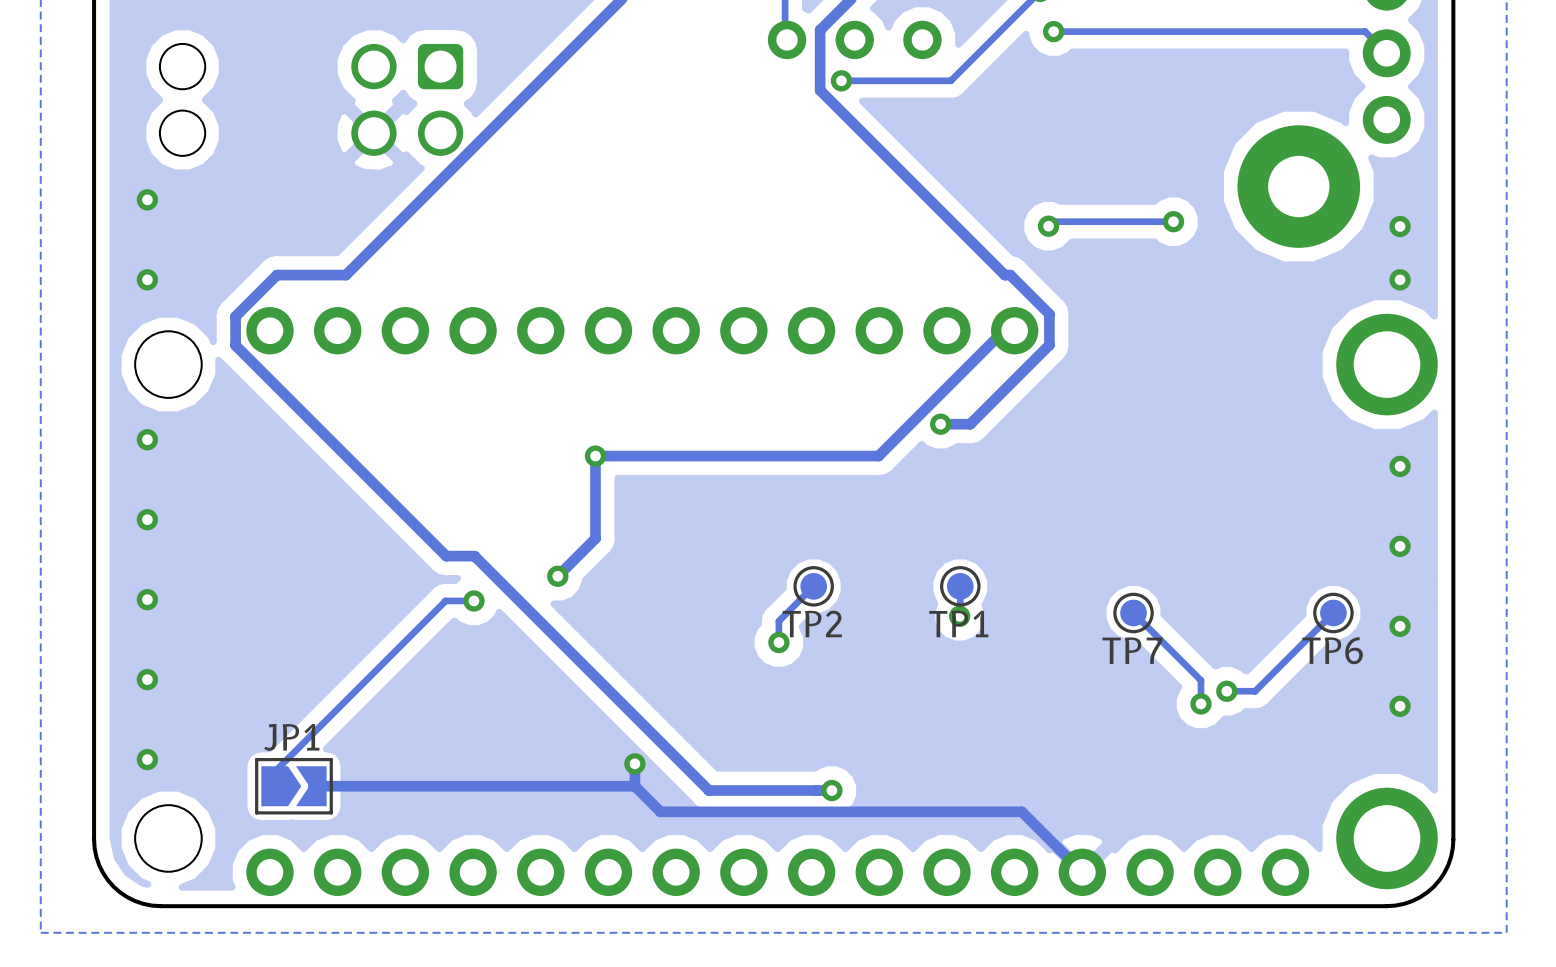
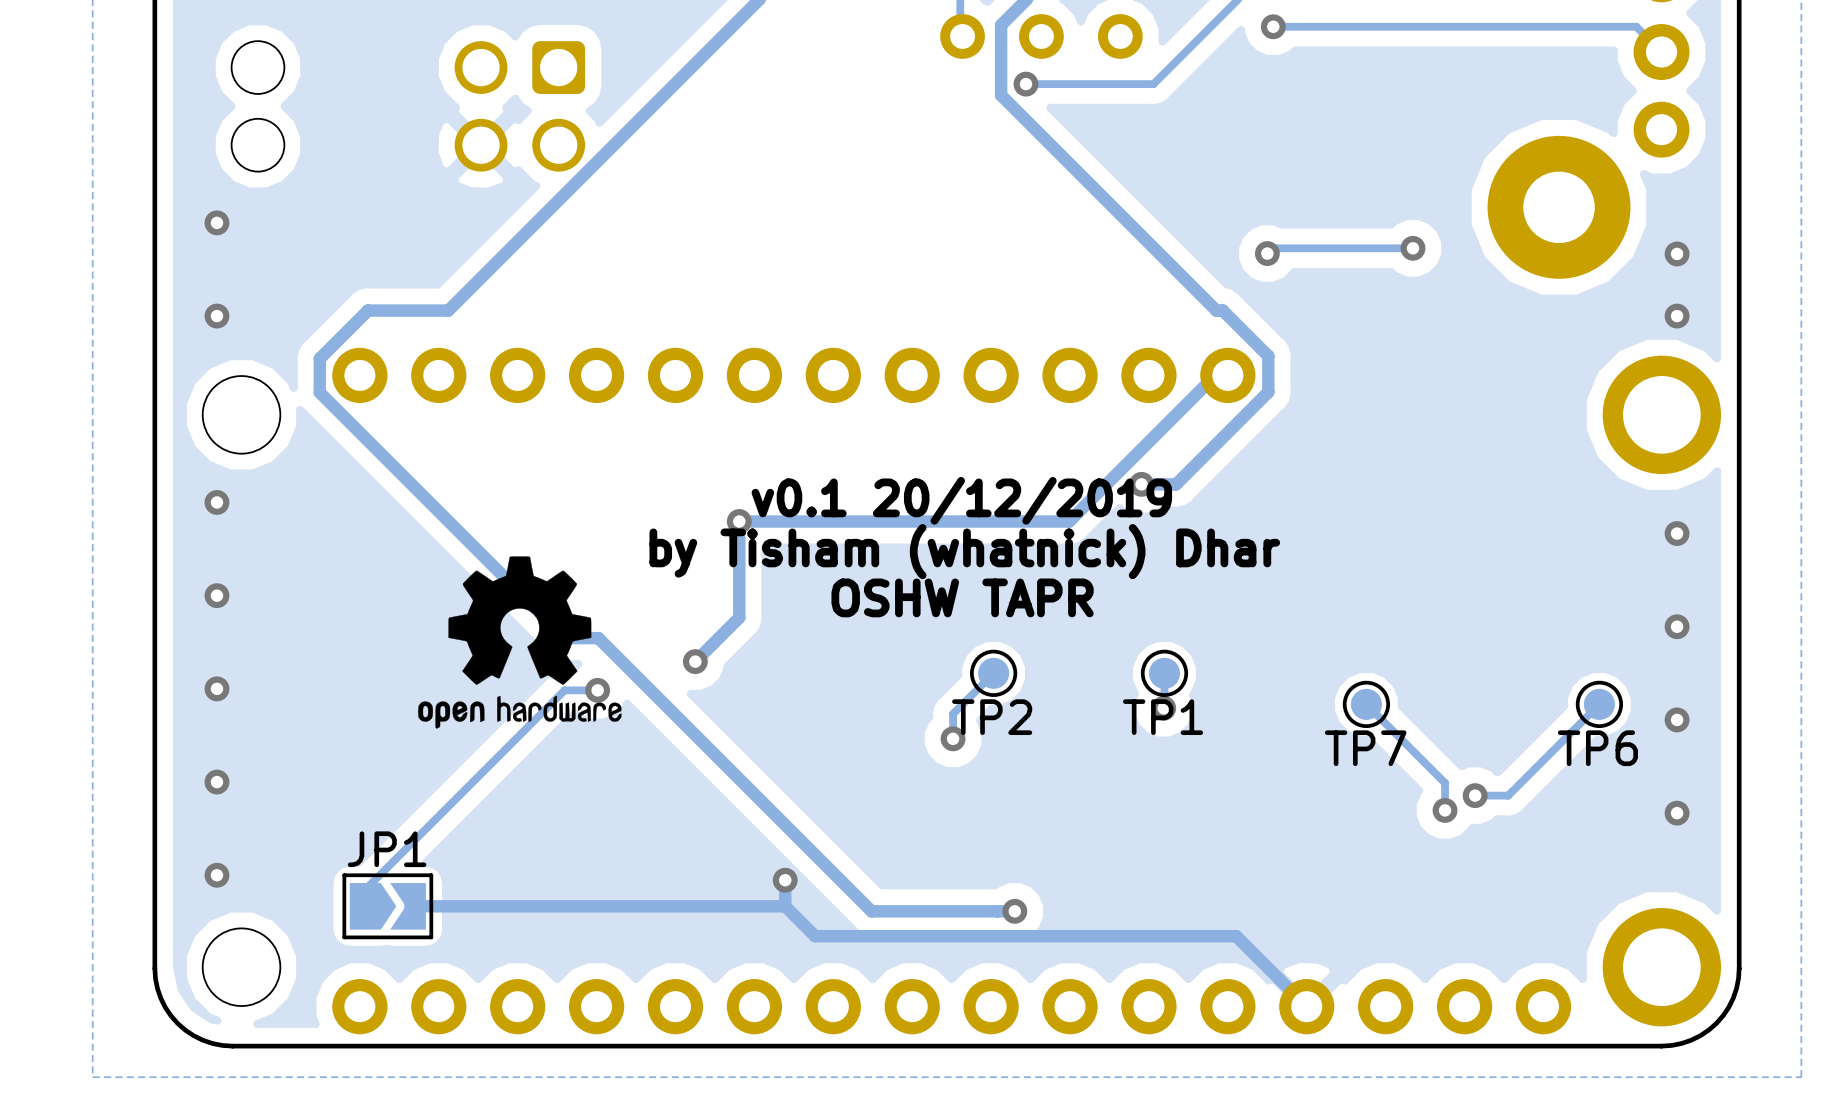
text: none -> v0.1 20/12/2019 (961, 500)
text: none -> by Tisham (whatnick) Dhar (964, 551)
drawing: none -> [418, 556, 622, 729]
text: none -> OSHW TAPR (962, 597)

